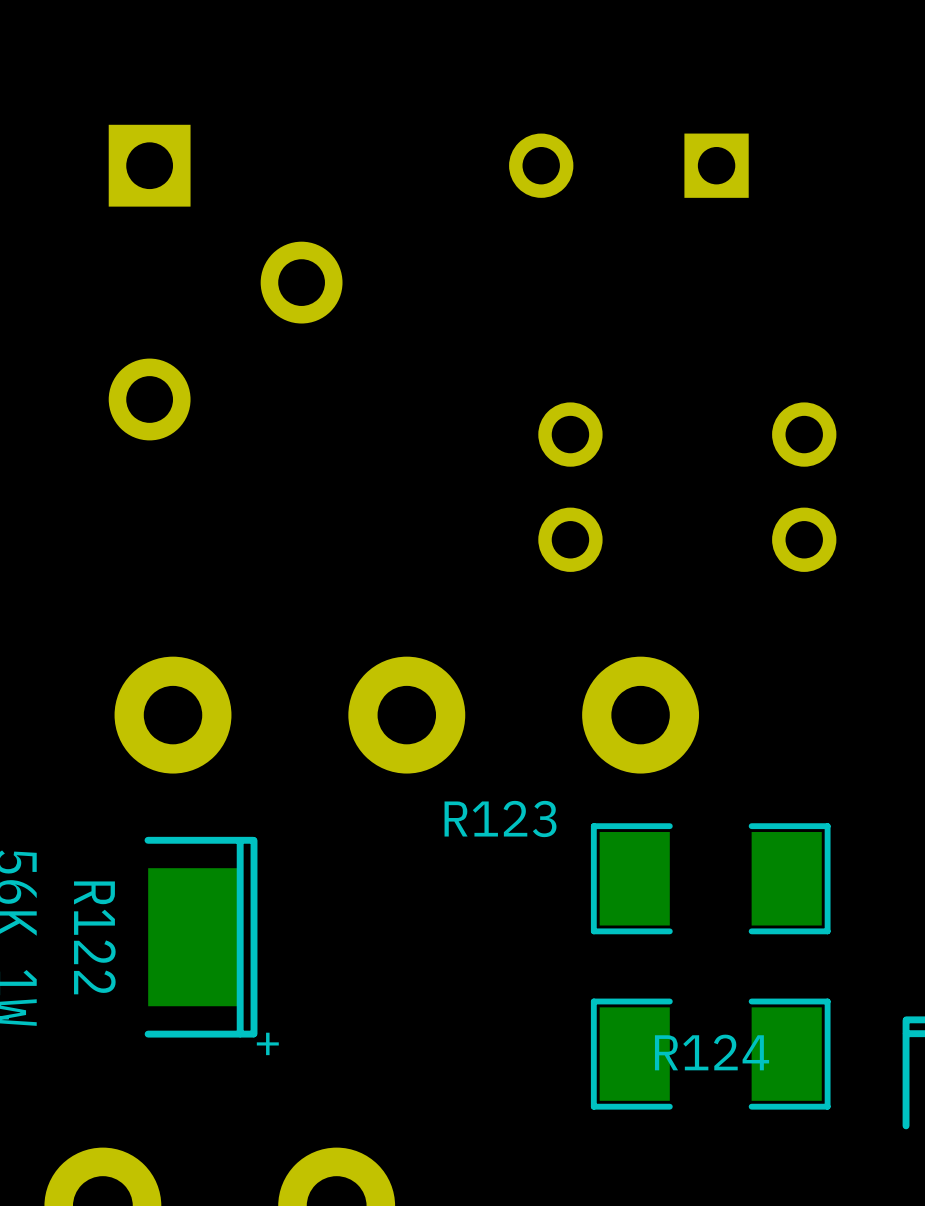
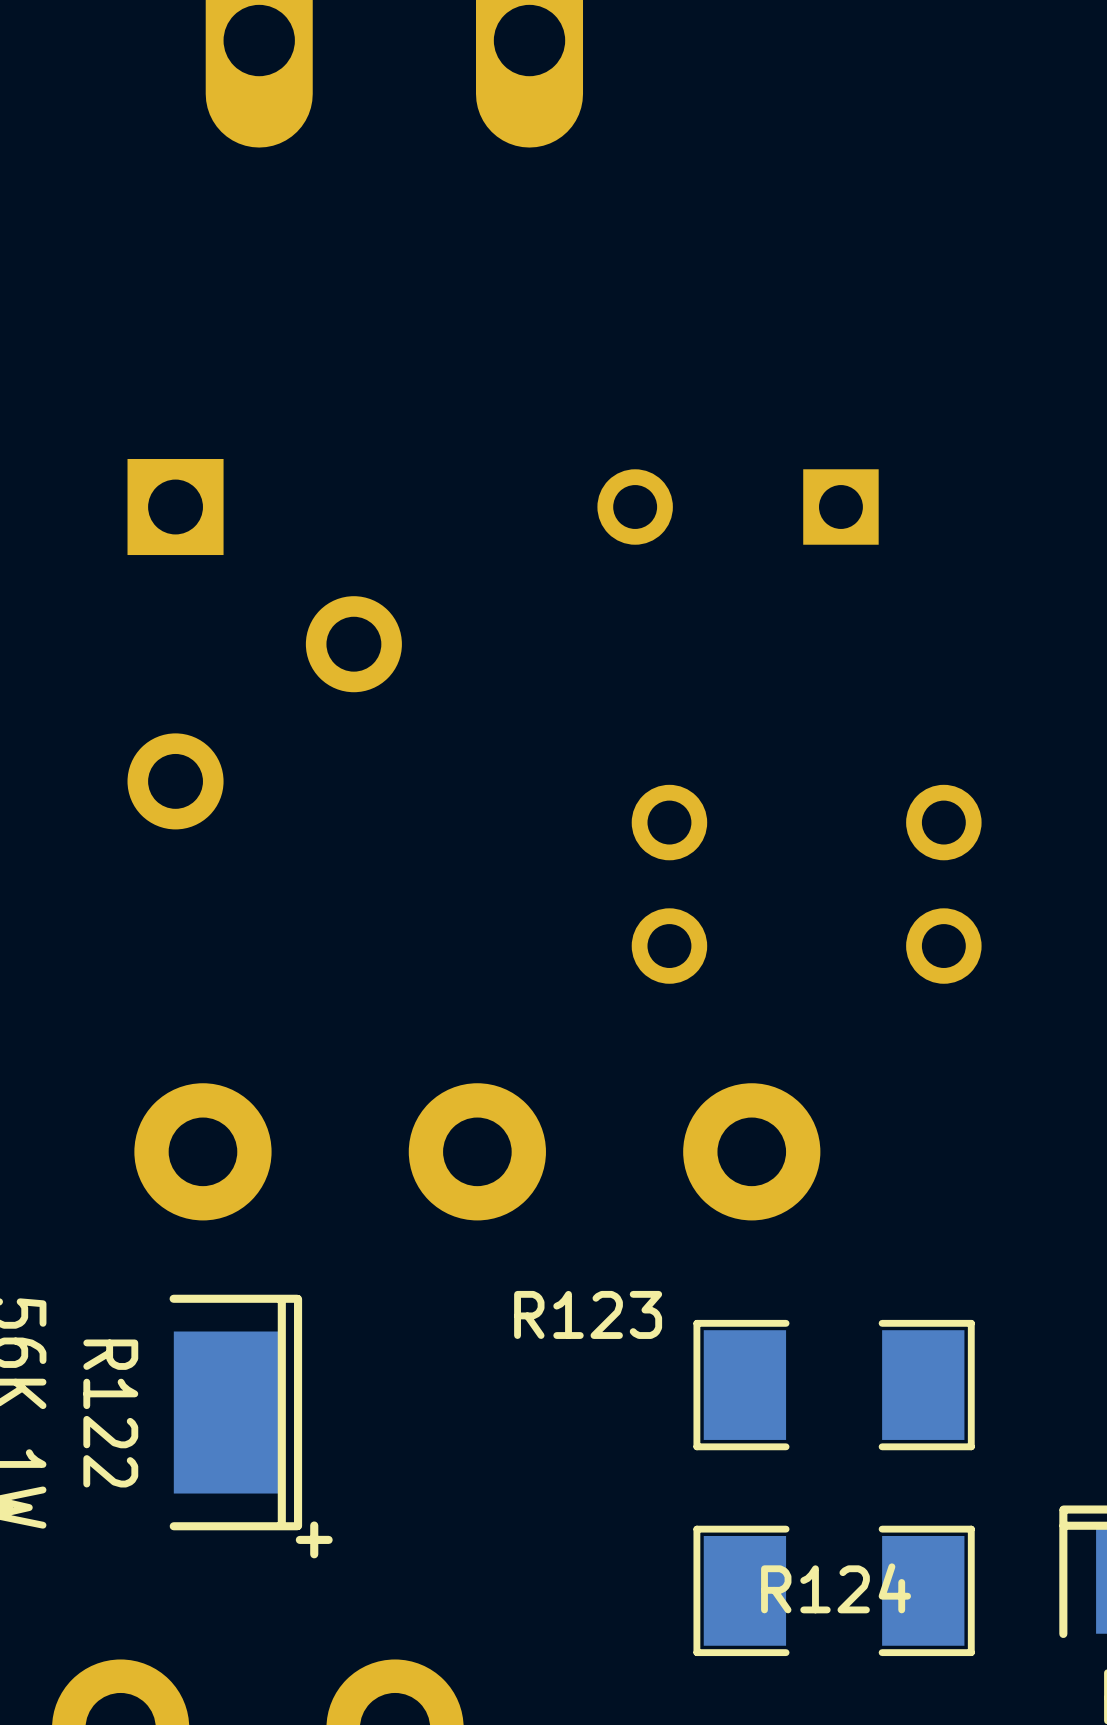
R123 position: (710, 878) -> (834, 1385)
R124 position: (710, 1054) -> (834, 1590)

